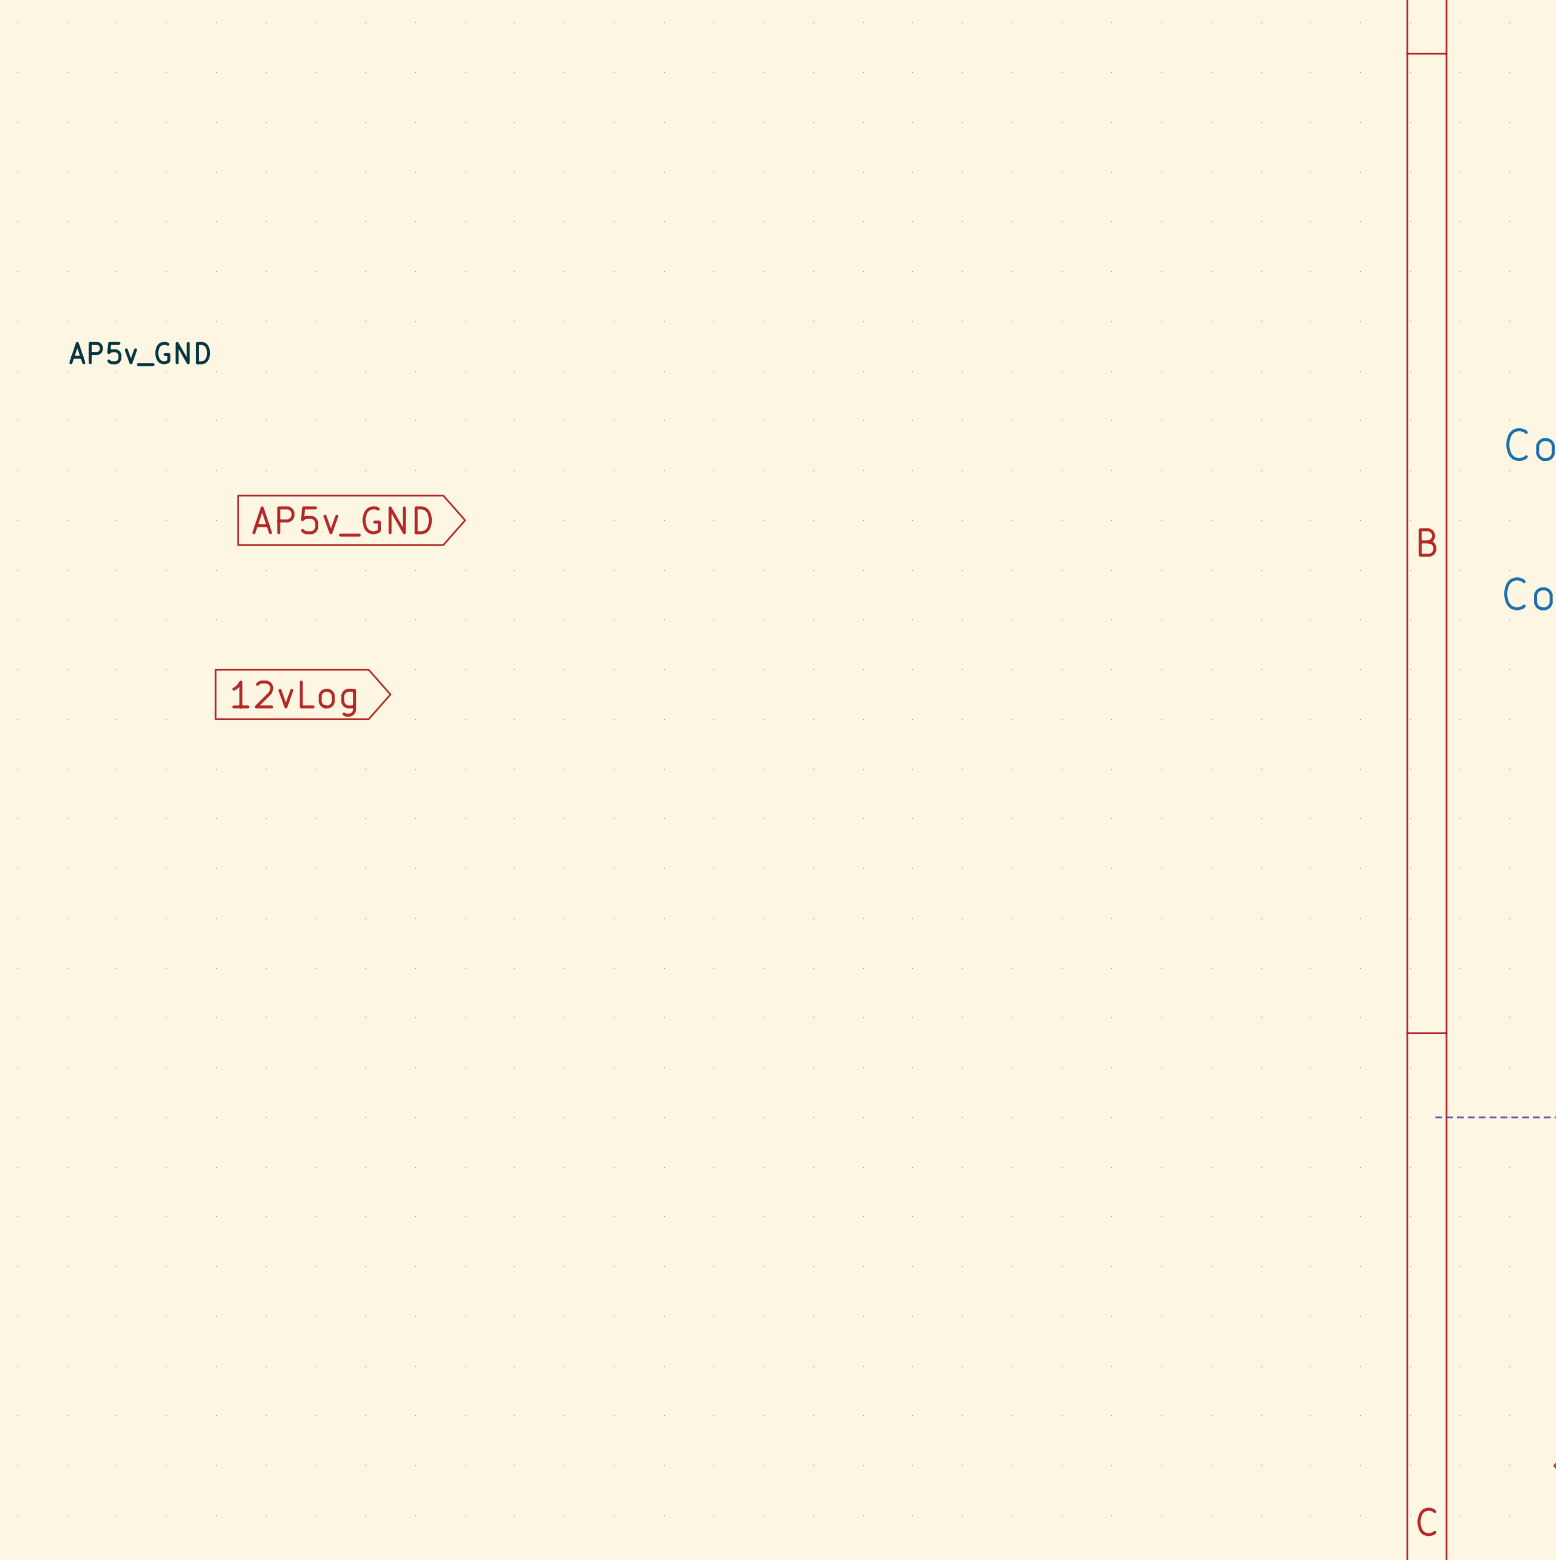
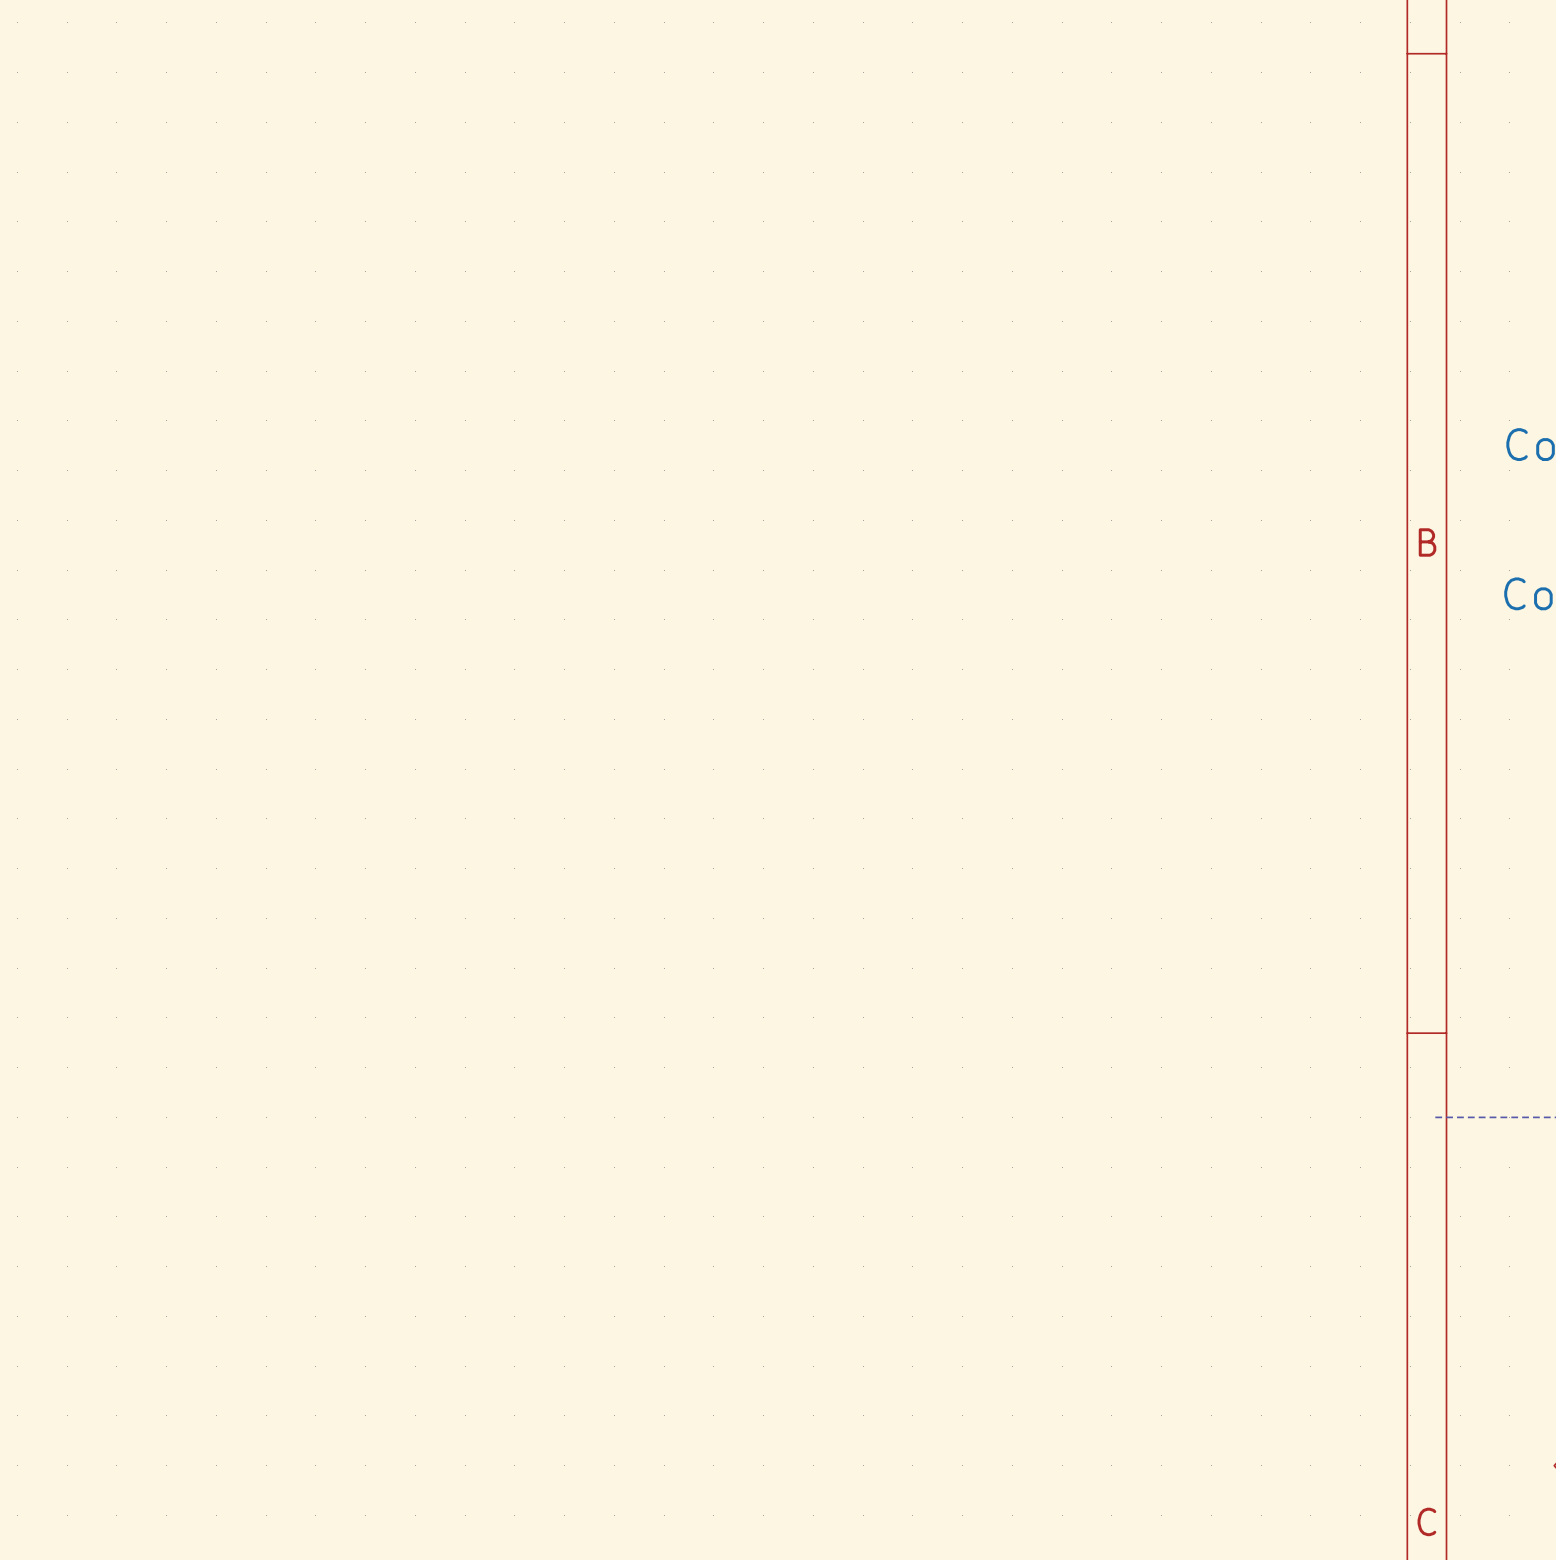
label: AP5v_GND (139, 354) -> none
global label: AP5v_GND (342, 521) -> none
global label: 12vLog (294, 698) -> none

